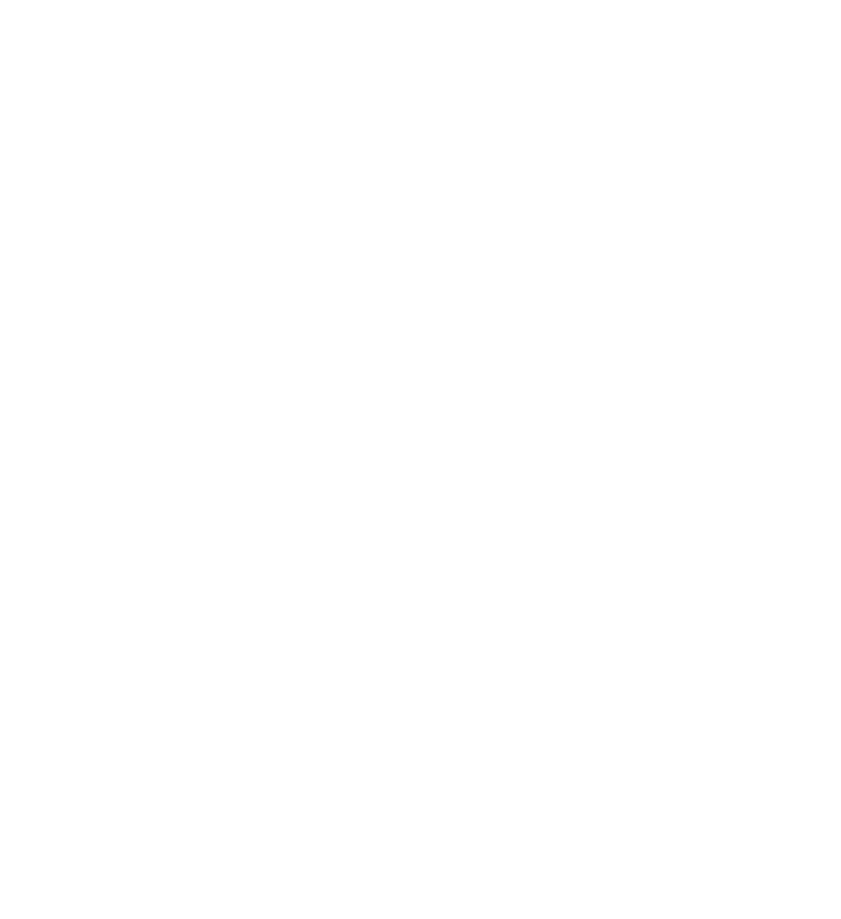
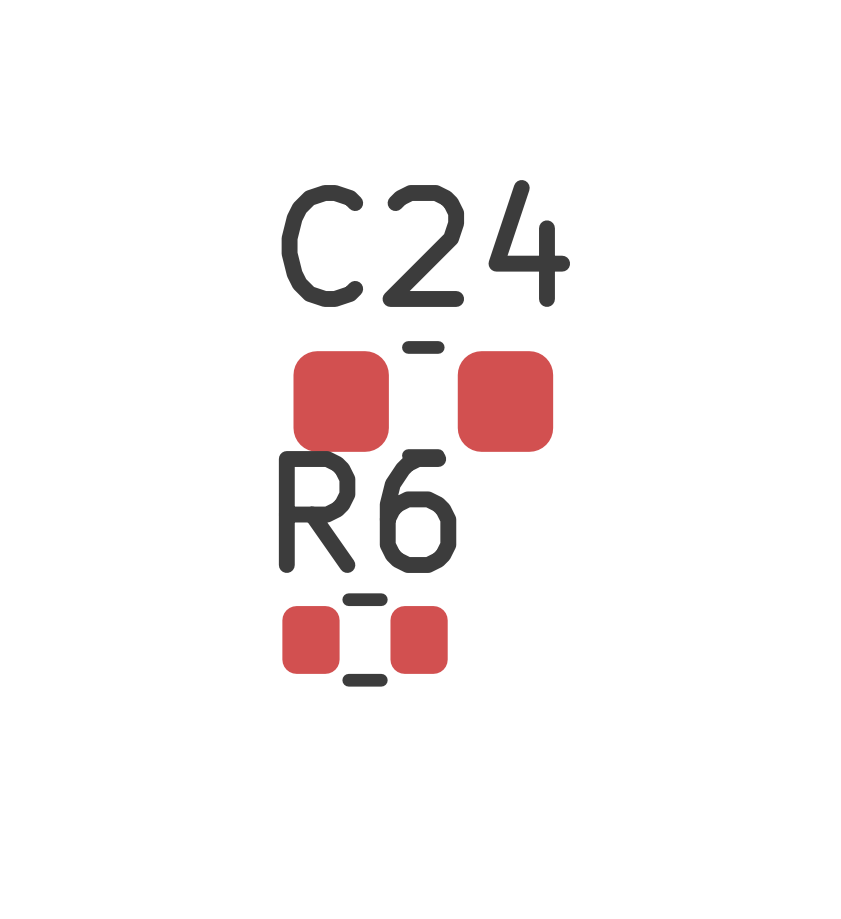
C24: none -> (423, 401)
R6: none -> (365, 639)

